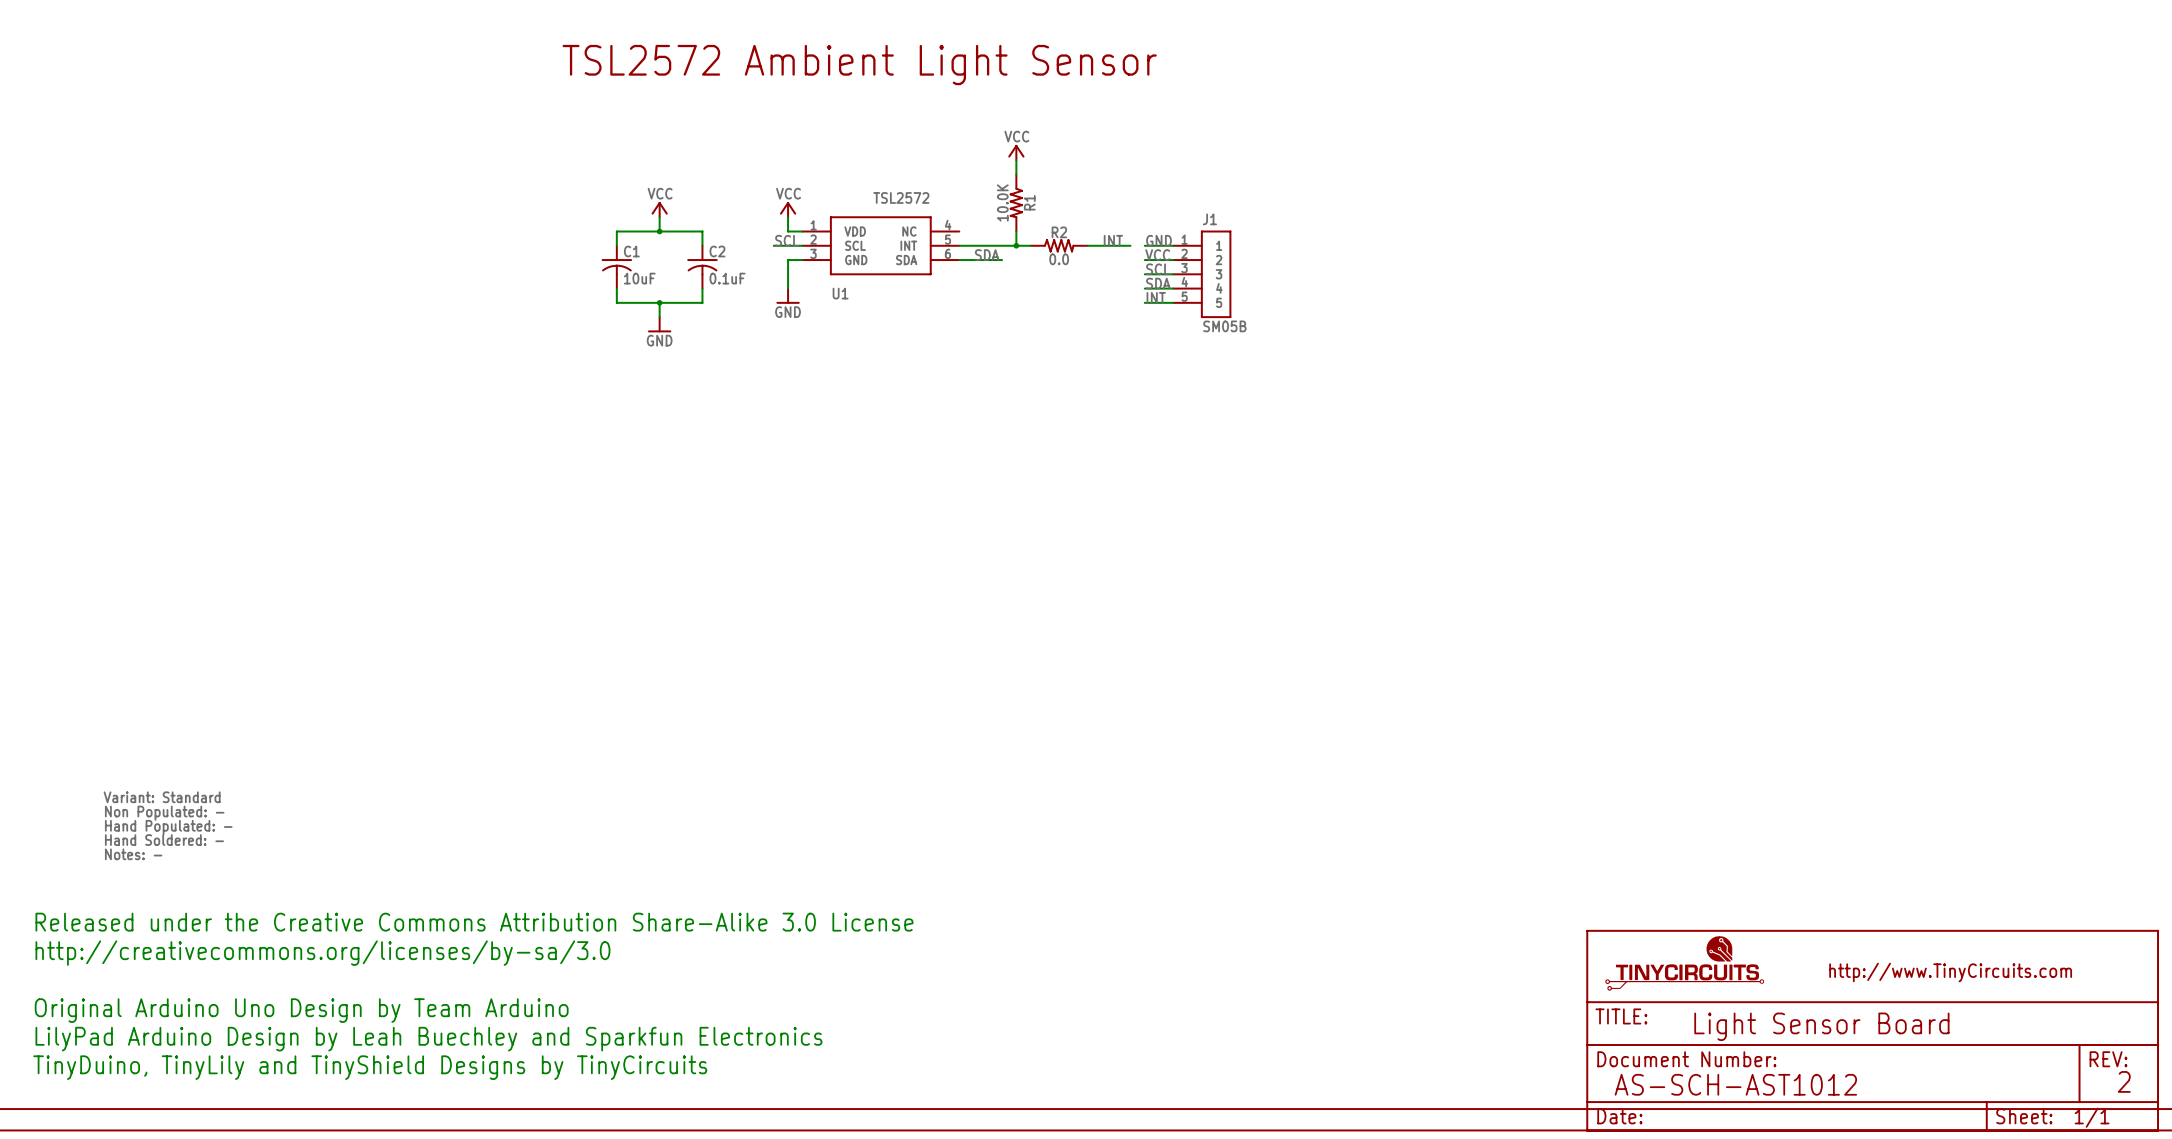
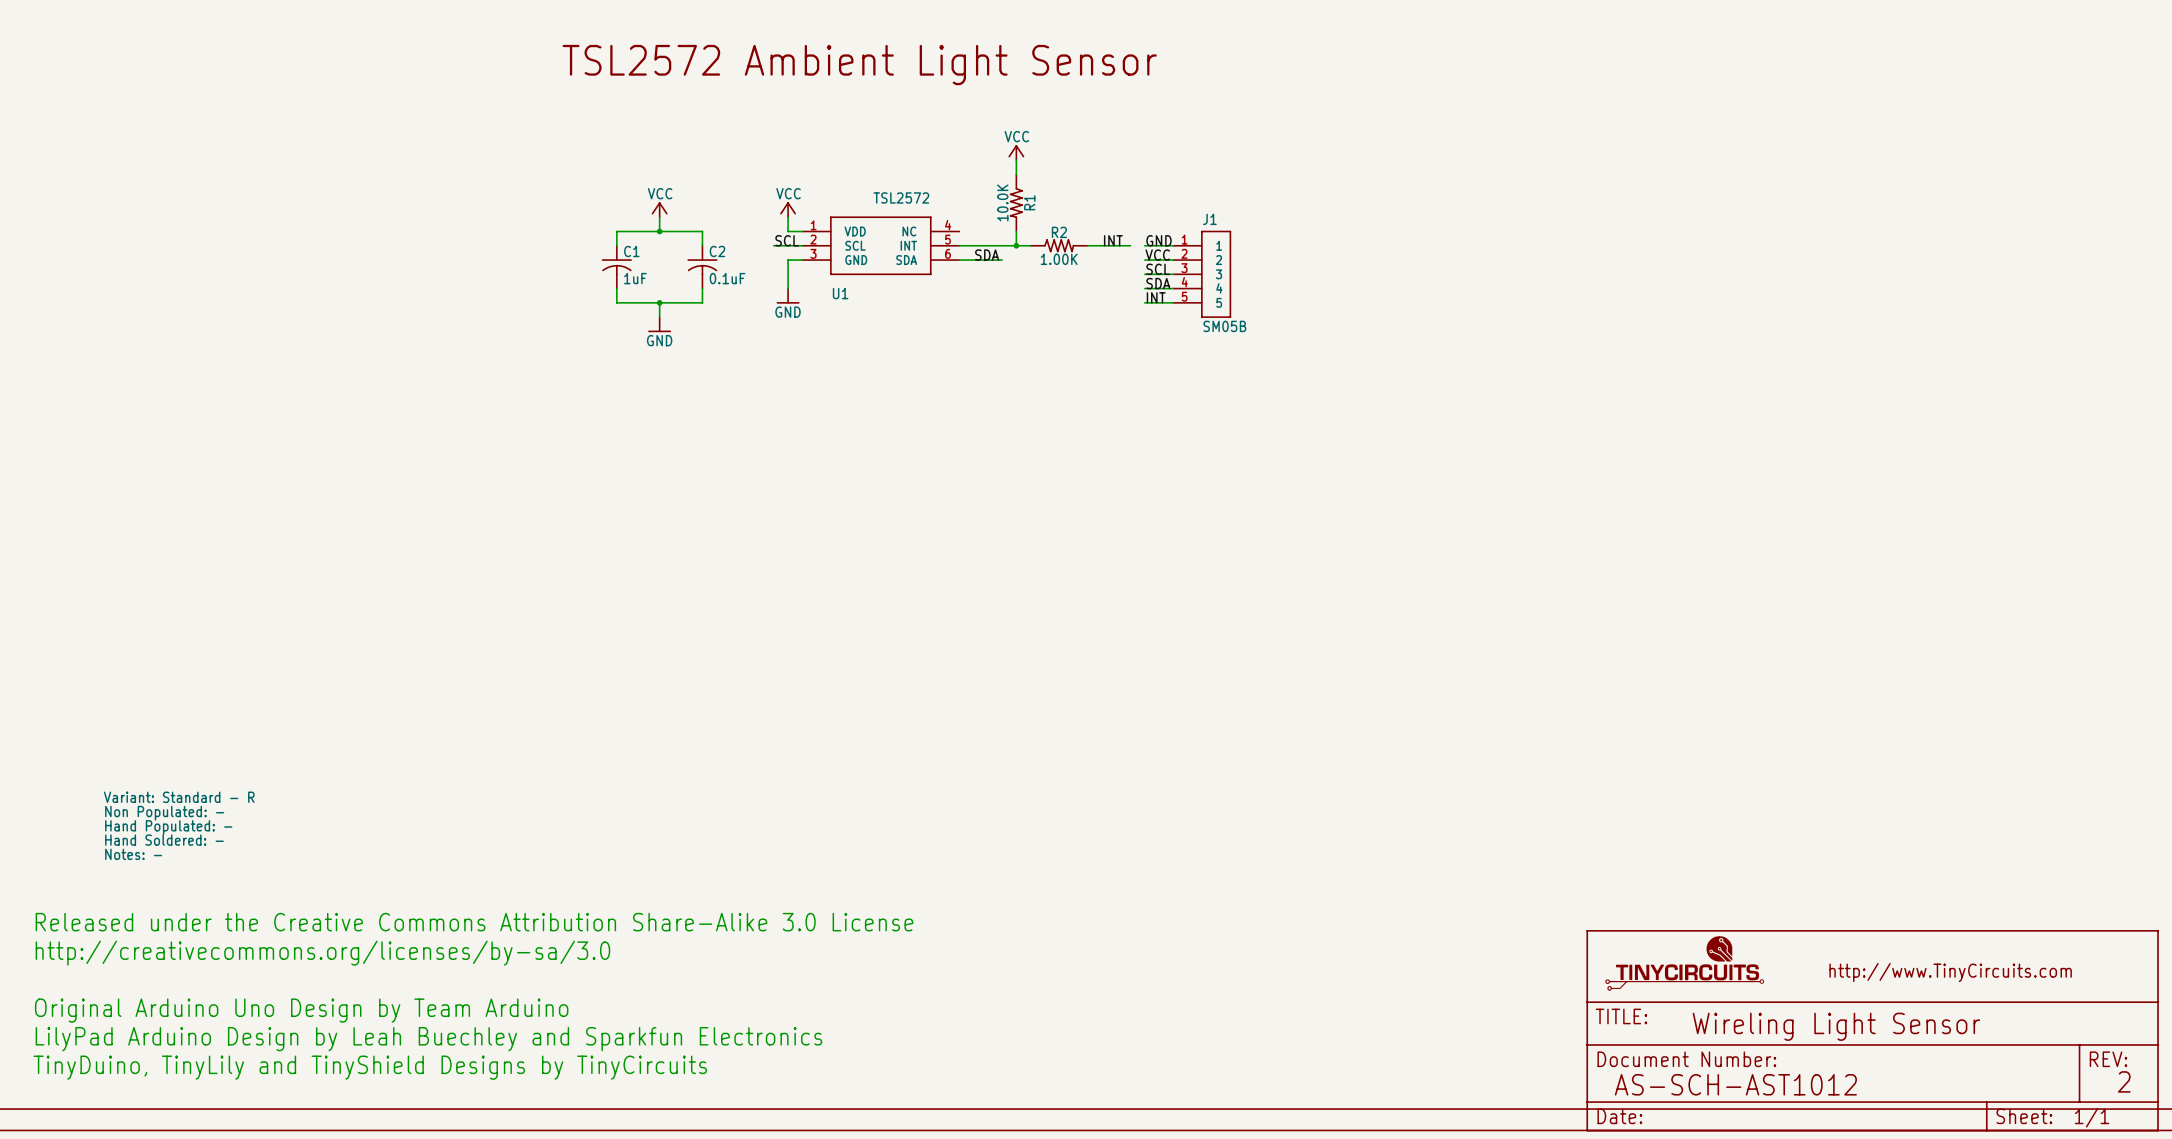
R2 value: 0.0 (1059, 259) -> 1.00K (1059, 259)
C1 value: 10uF (639, 278) -> 1uF (635, 278)
text: Variant: Standard (162, 797) -> Variant: Standard - R (179, 797)
text: Light Sensor Board (1821, 1026) -> Wireling Light Sensor (1836, 1026)

